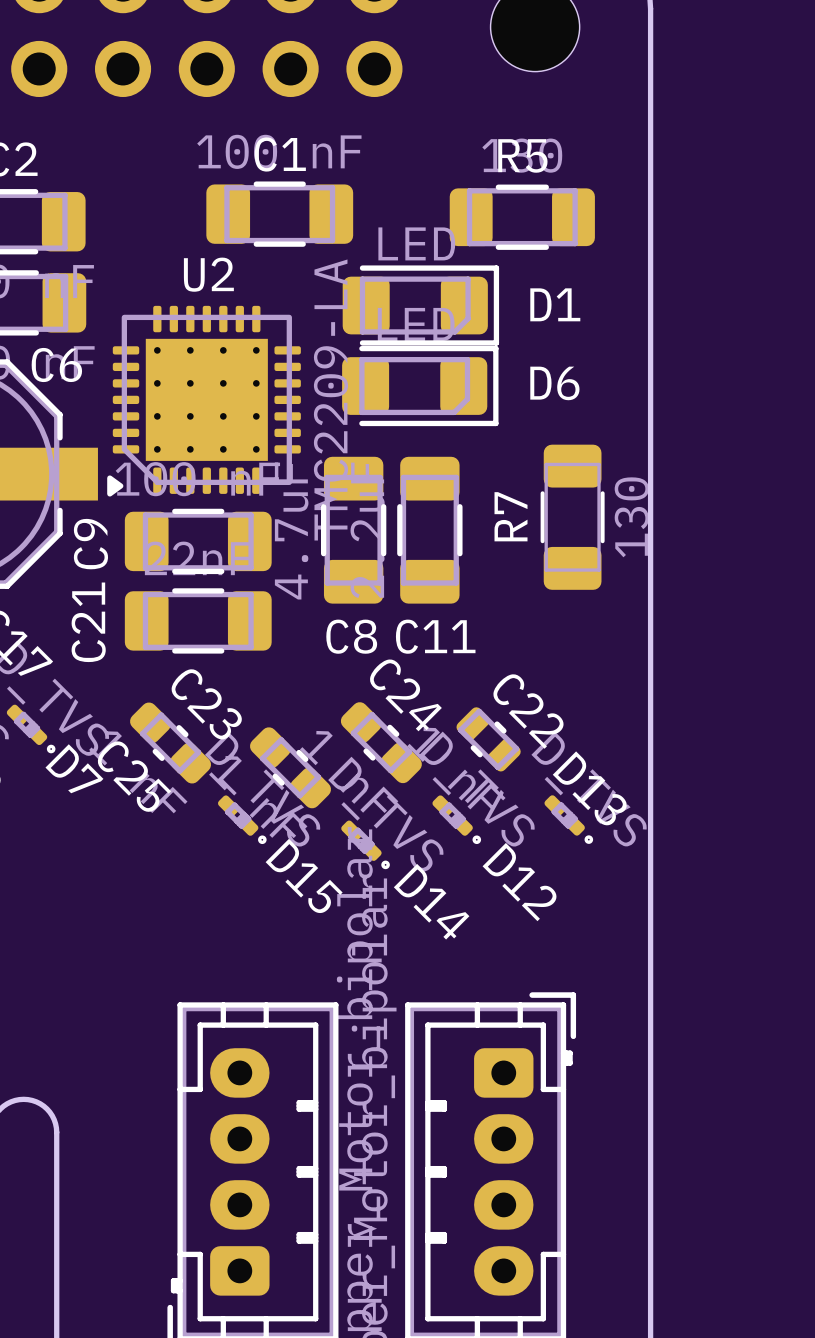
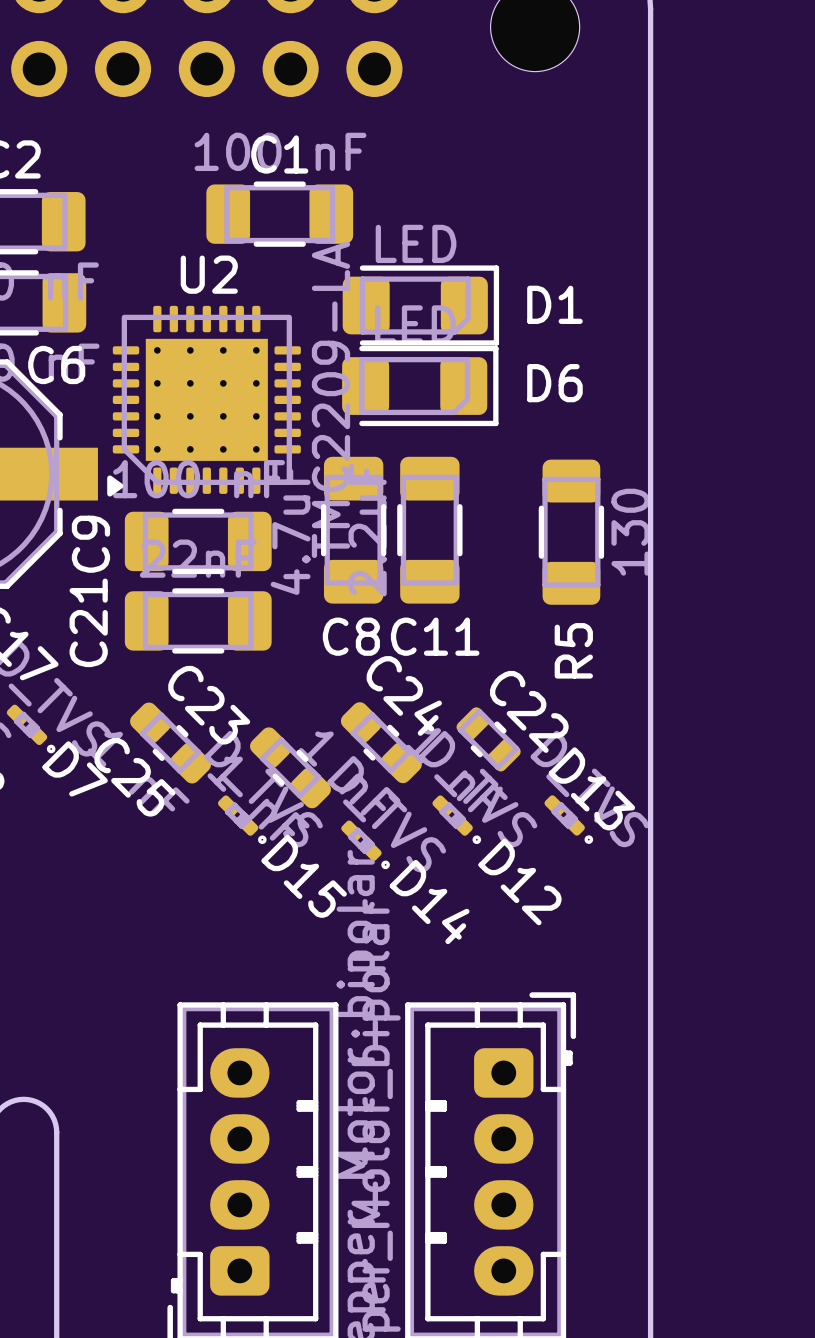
R5 name position: R5 (522, 155) -> R5 (573, 650)
R5 rotation: 0° (522, 217) -> 90° clockwise (571, 532)
R5 position: (522, 217) -> (571, 532)
R7: 130 (572, 517) -> none

